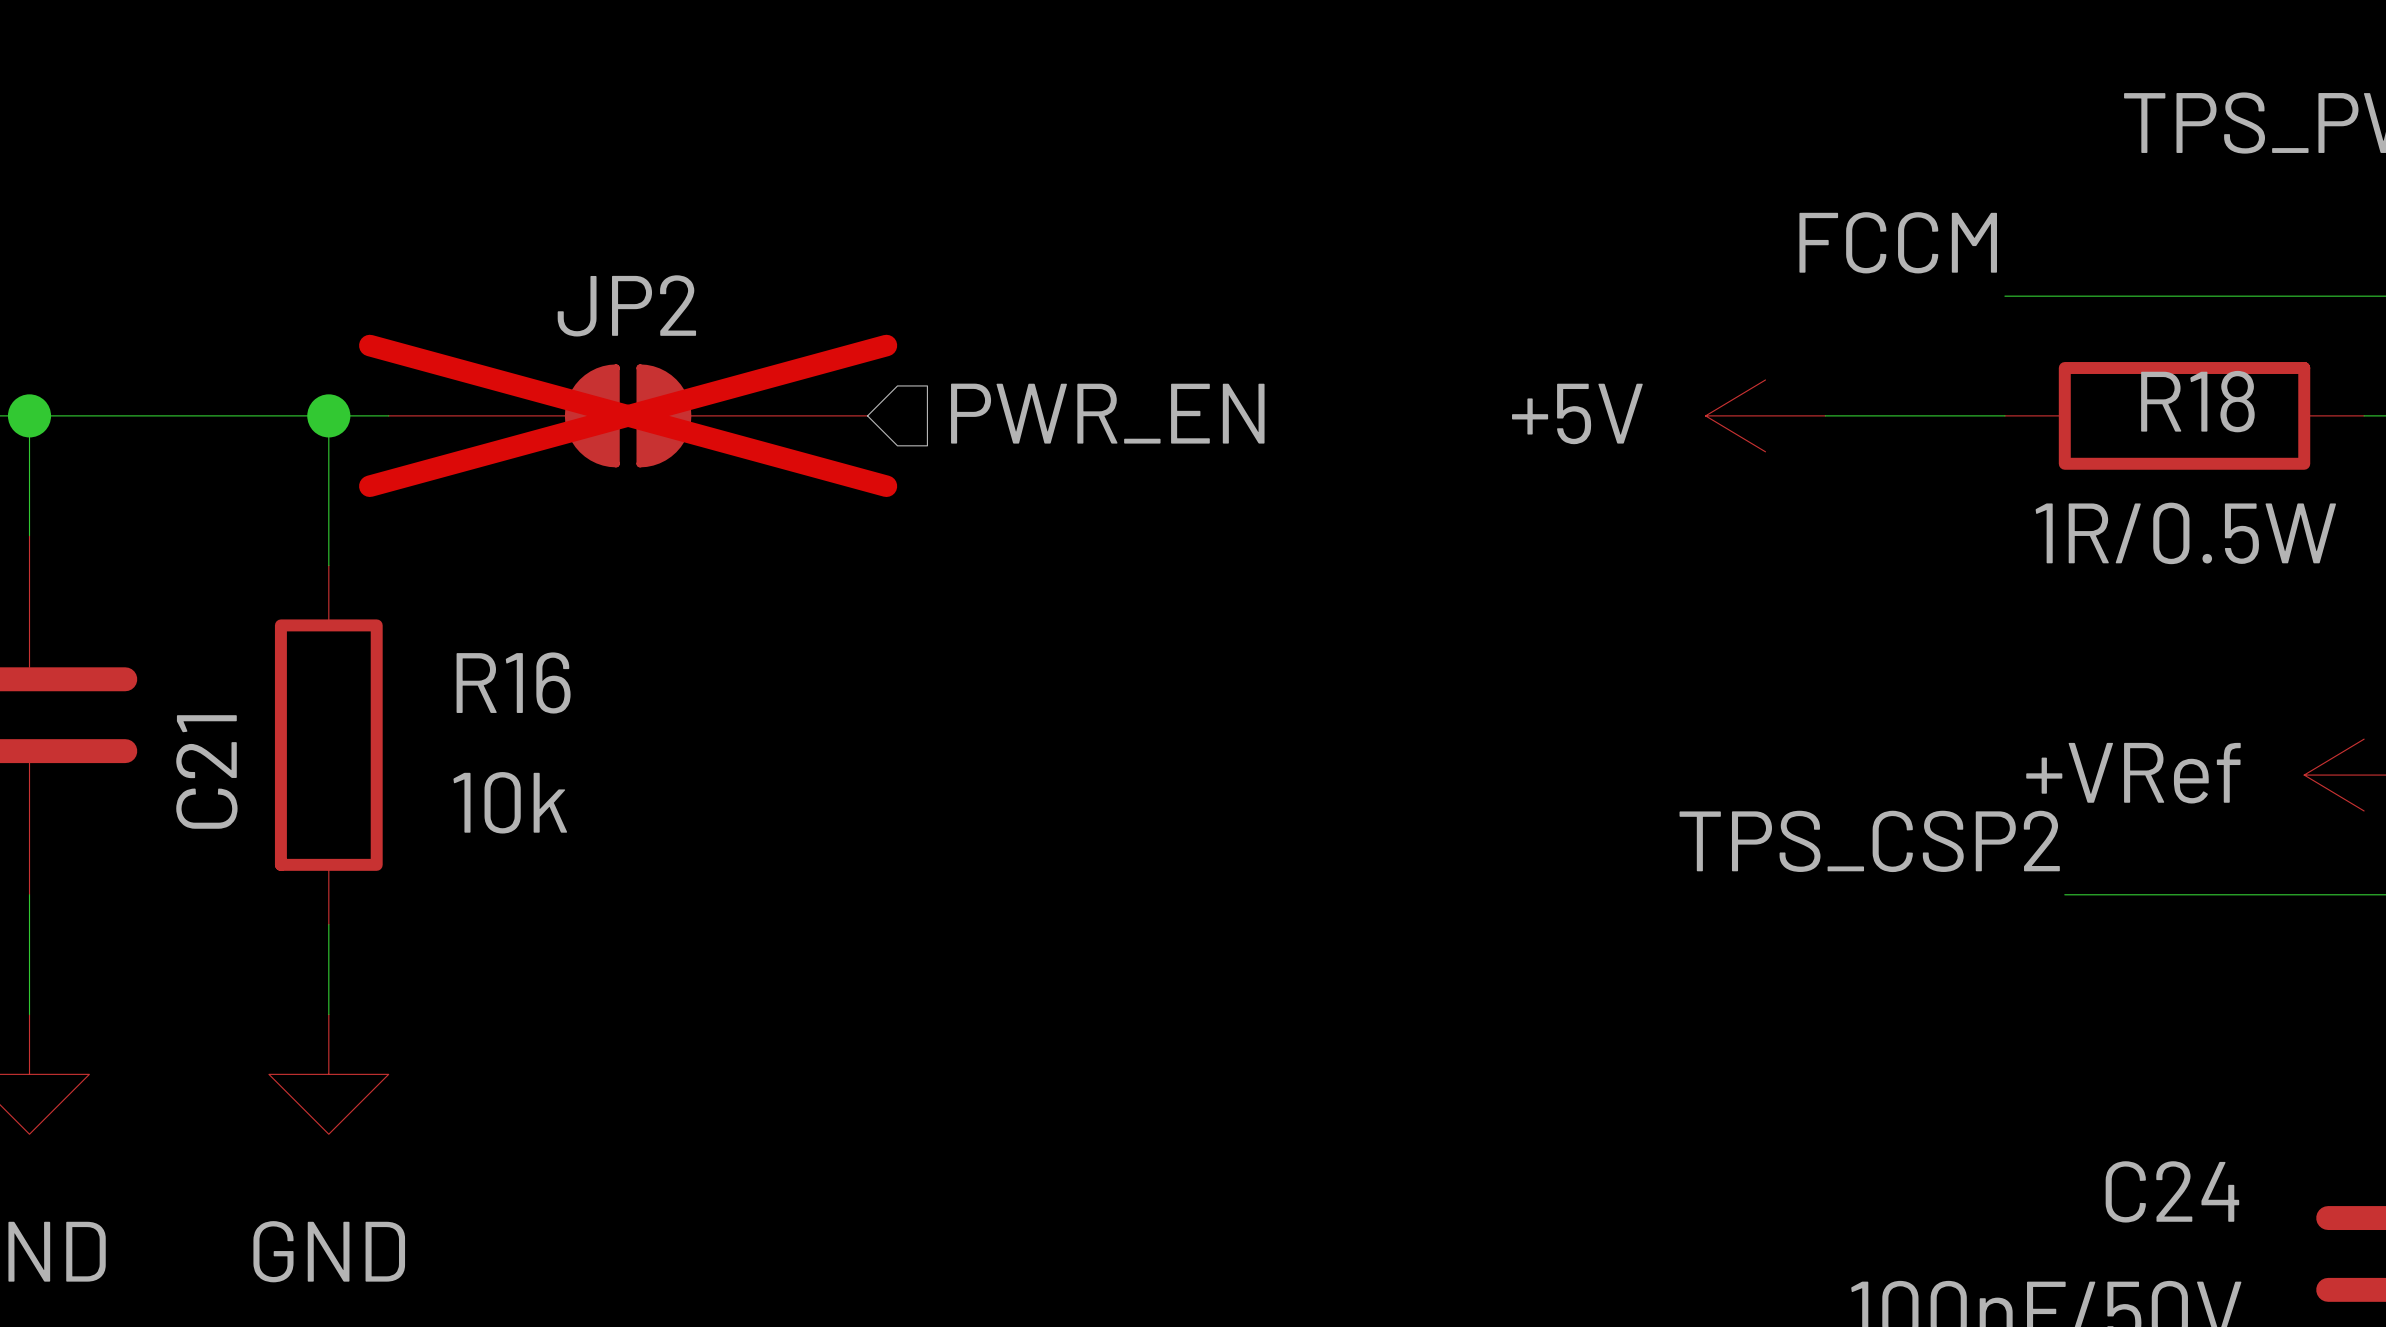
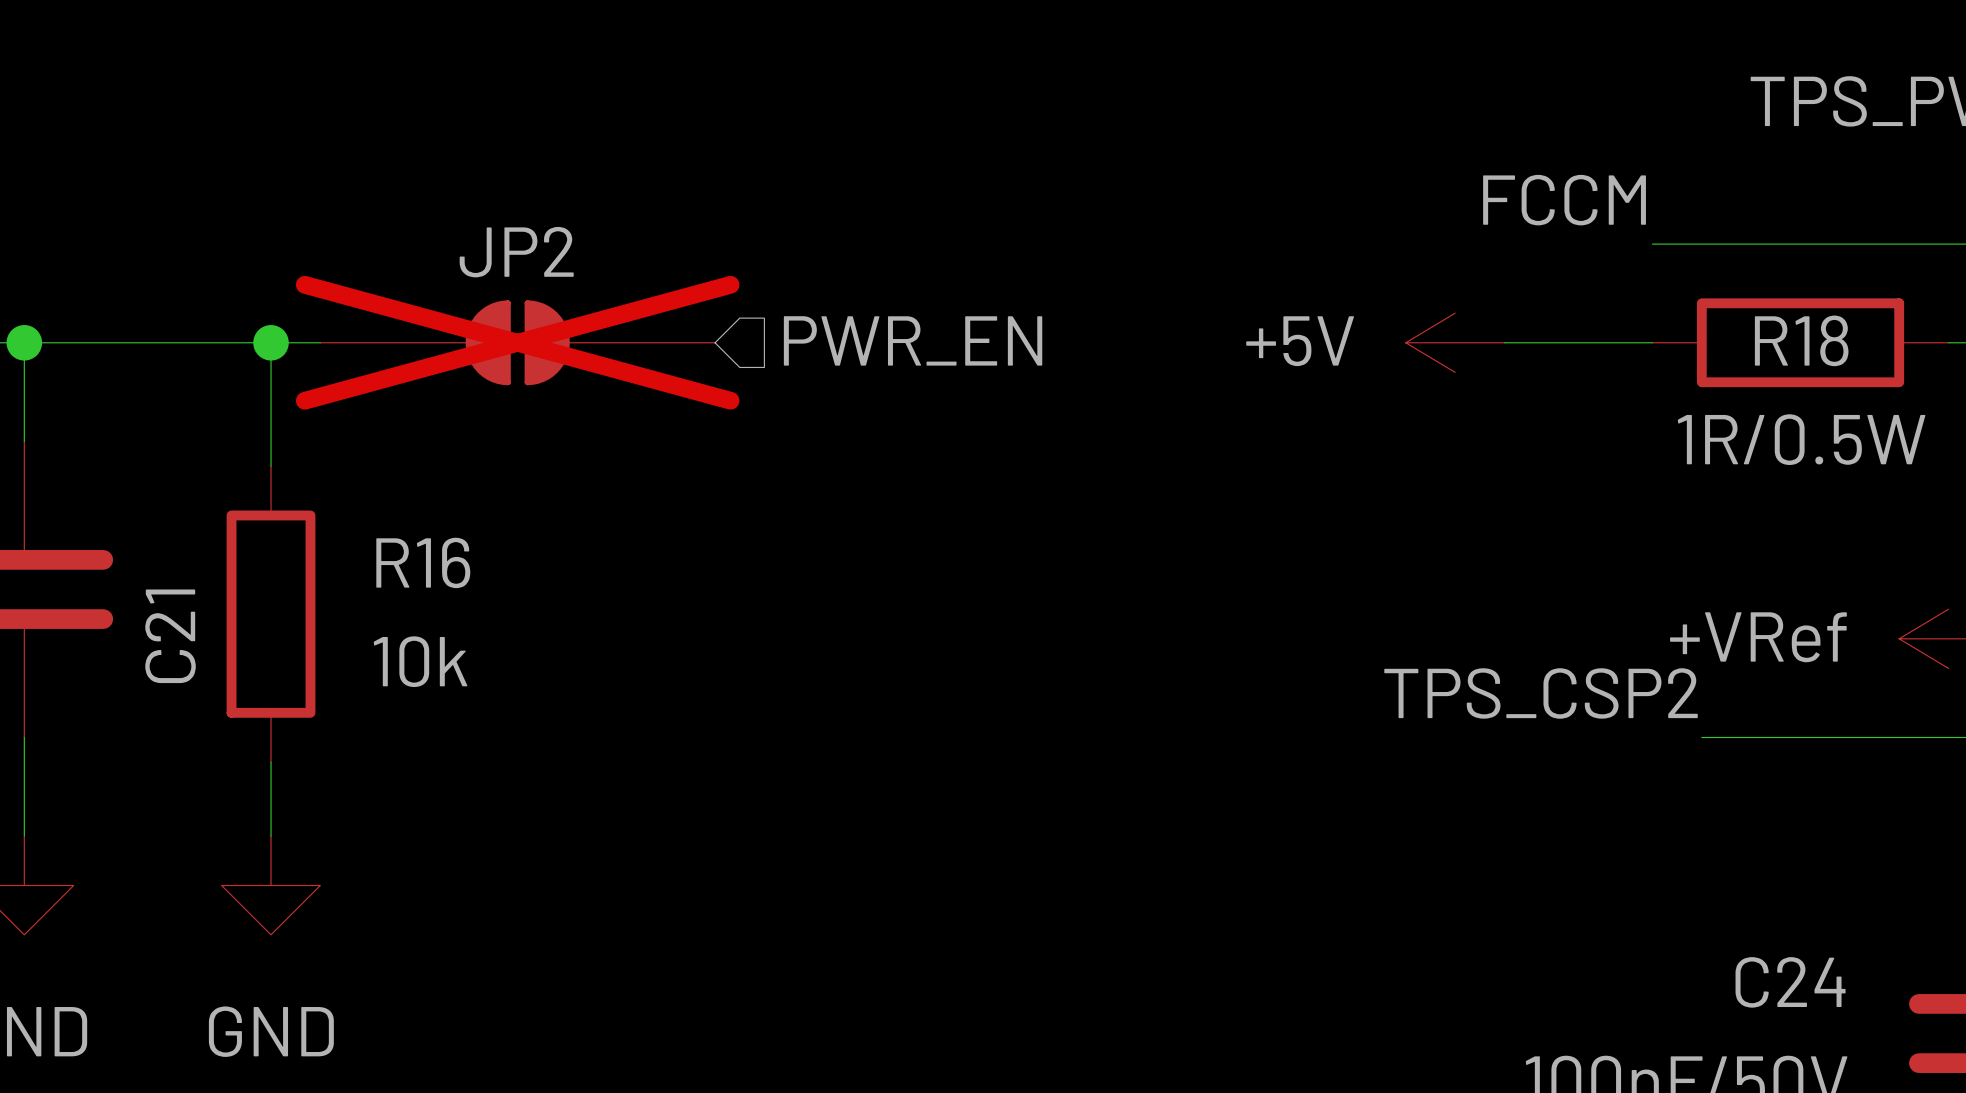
R18 name position: R18 (2197, 401) -> R18 (1801, 340)

